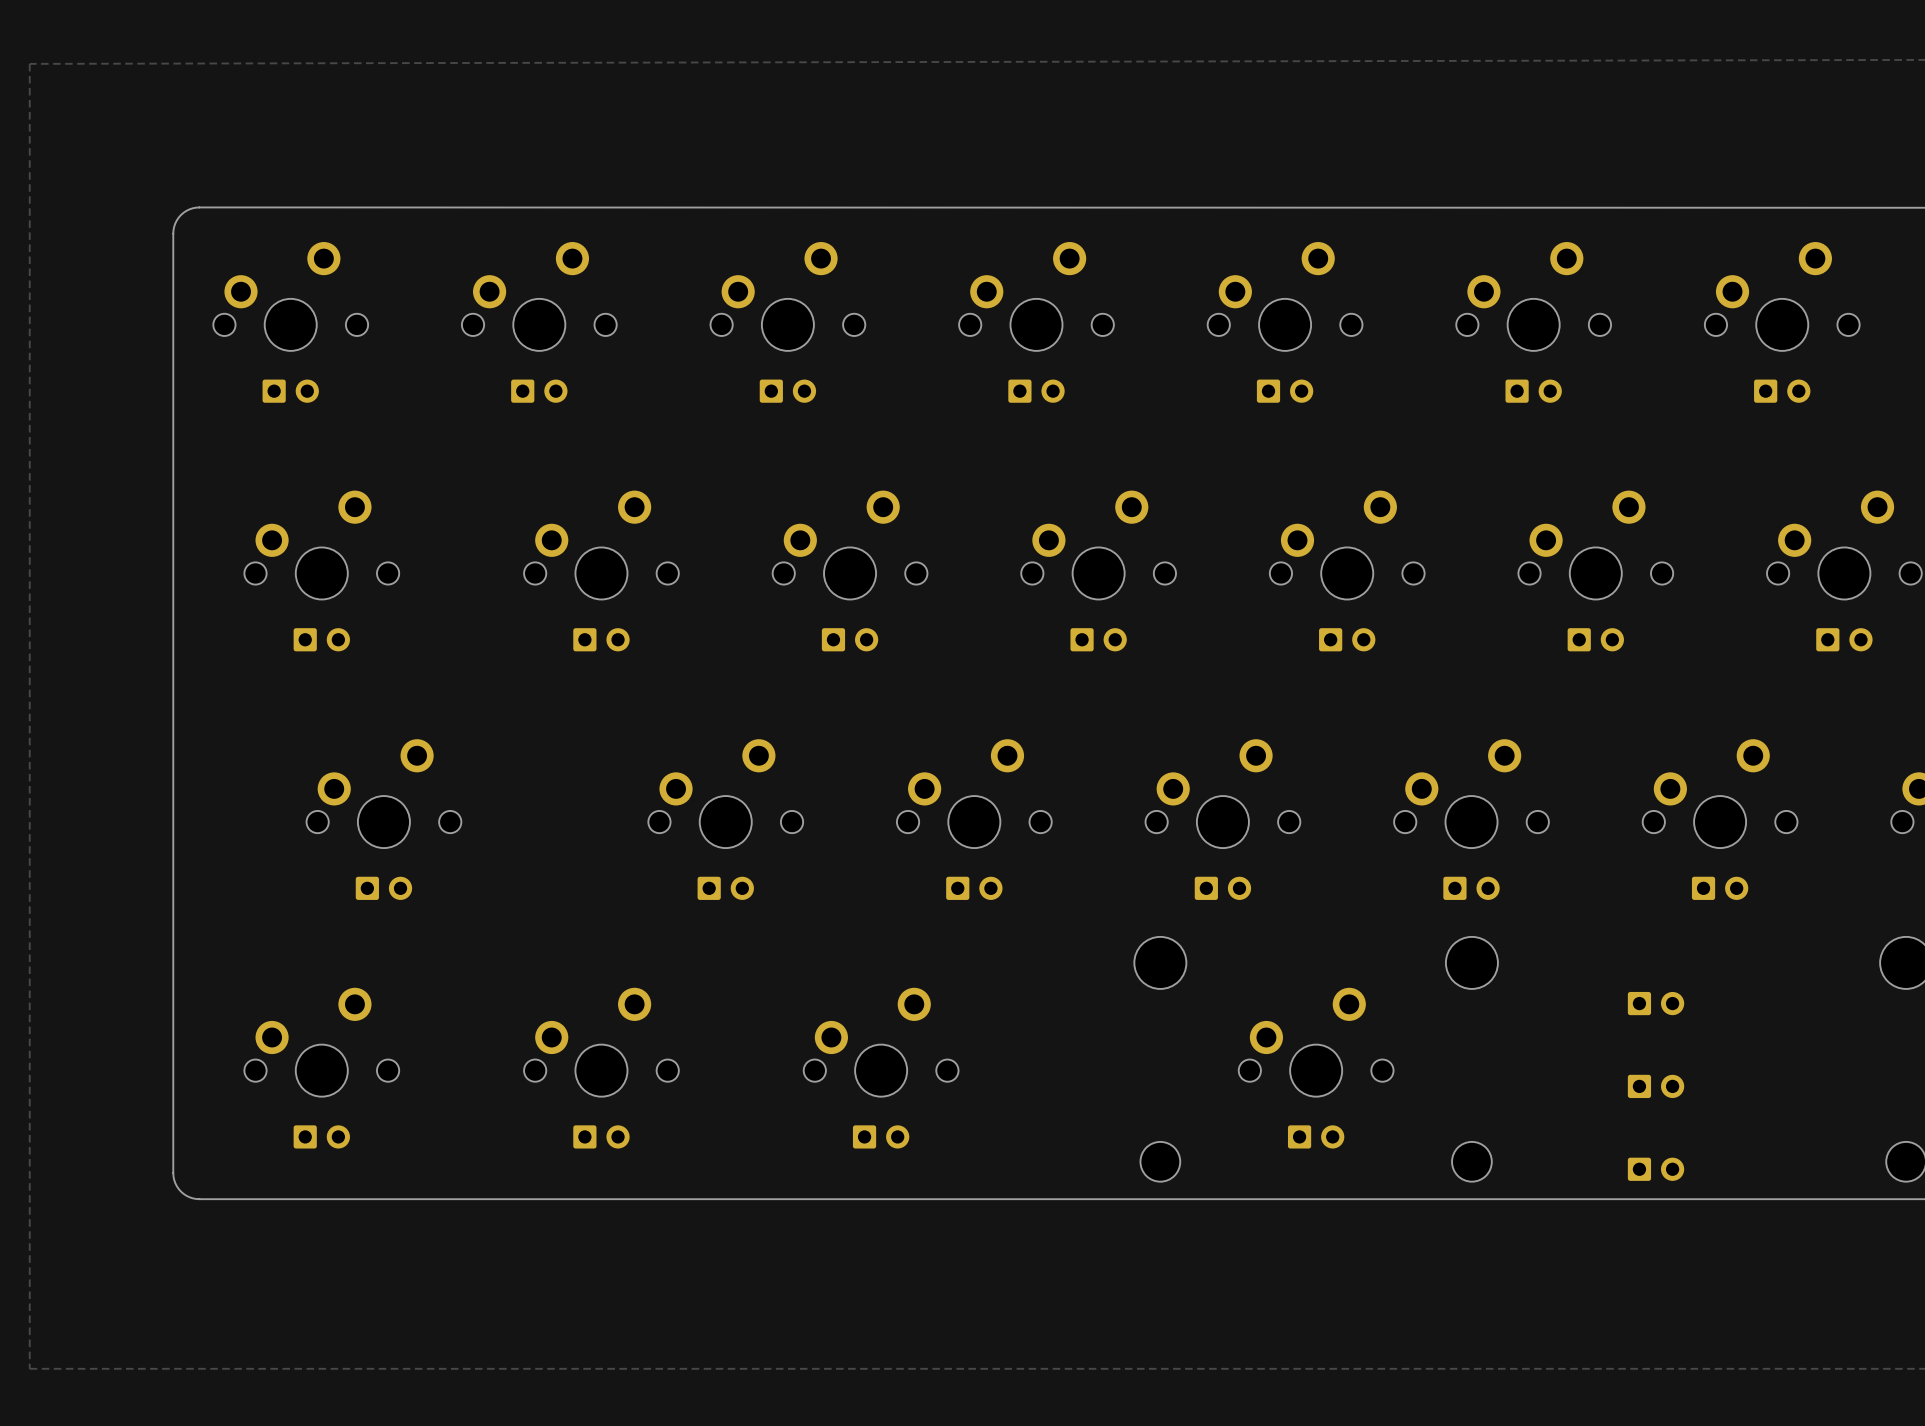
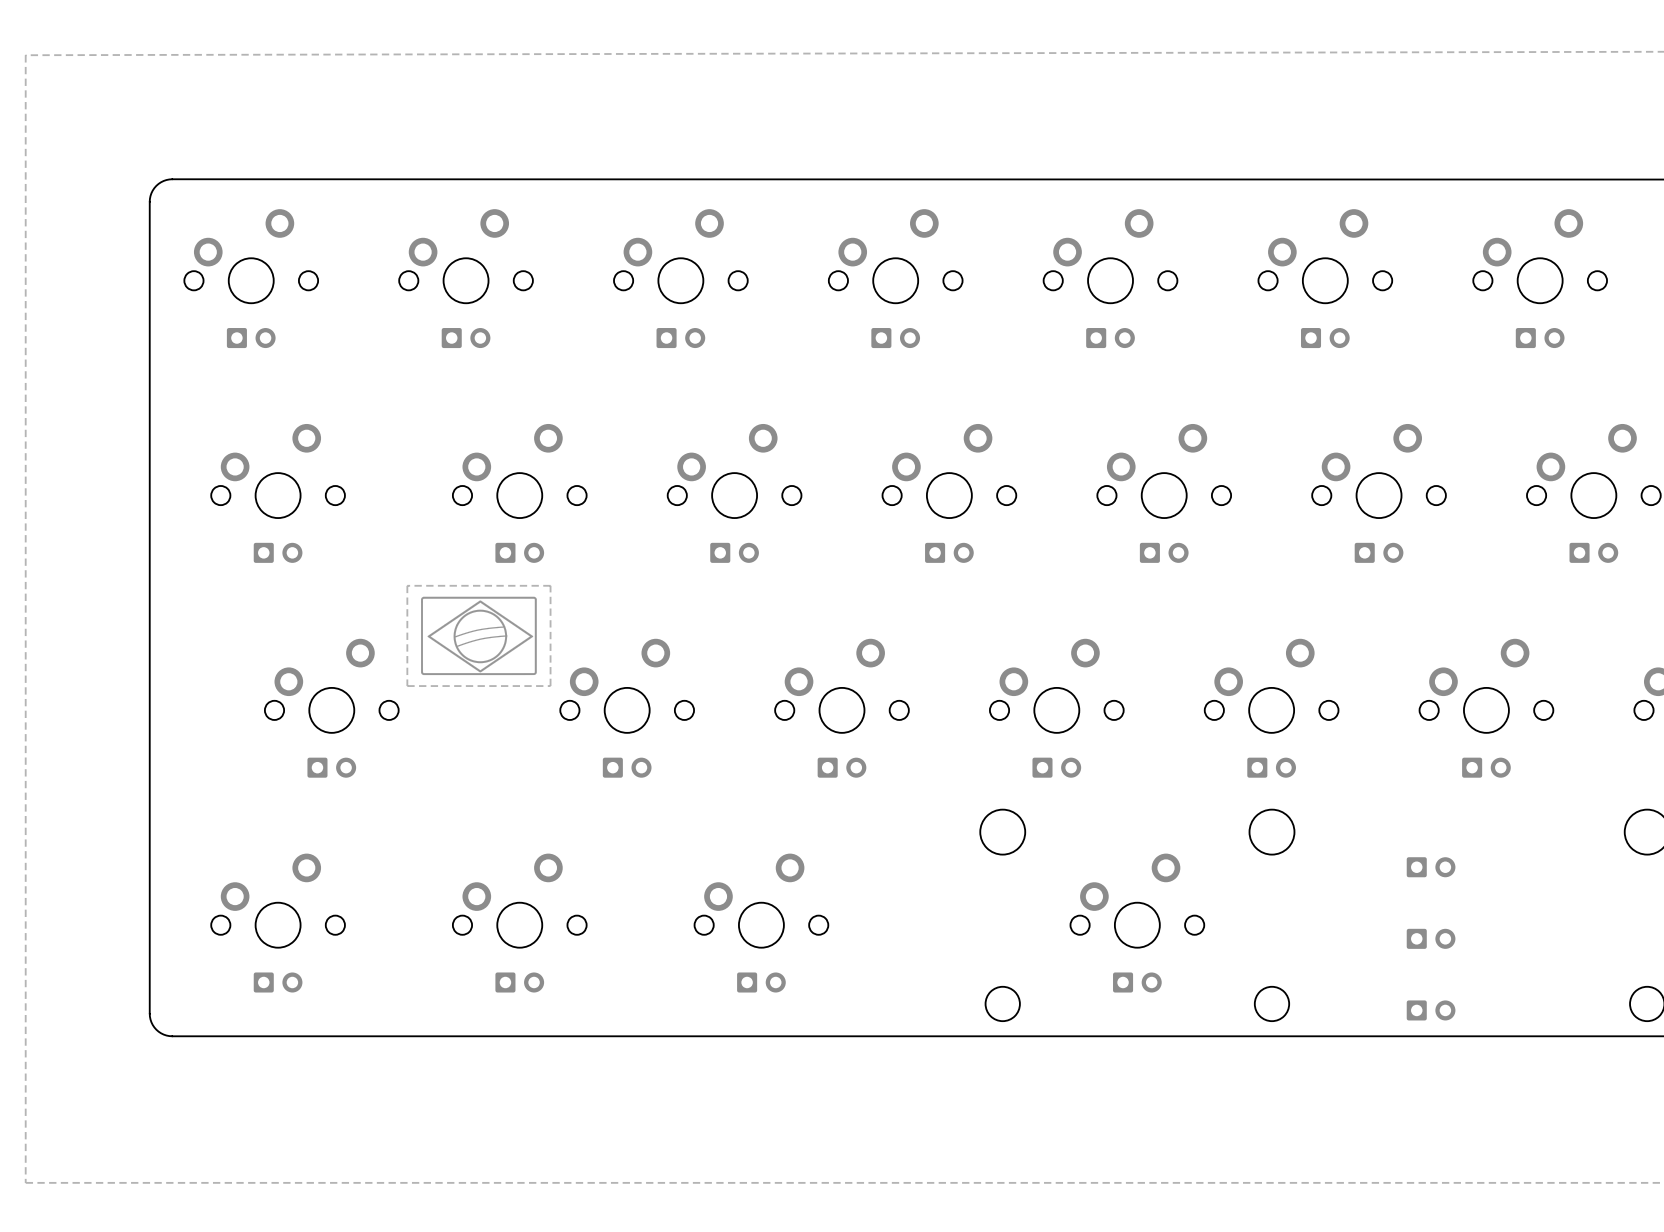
zone outline: none -> (550, 585) (550, 686) (407, 686) (407, 585) (550, 585)
part: none -> (478, 635)

